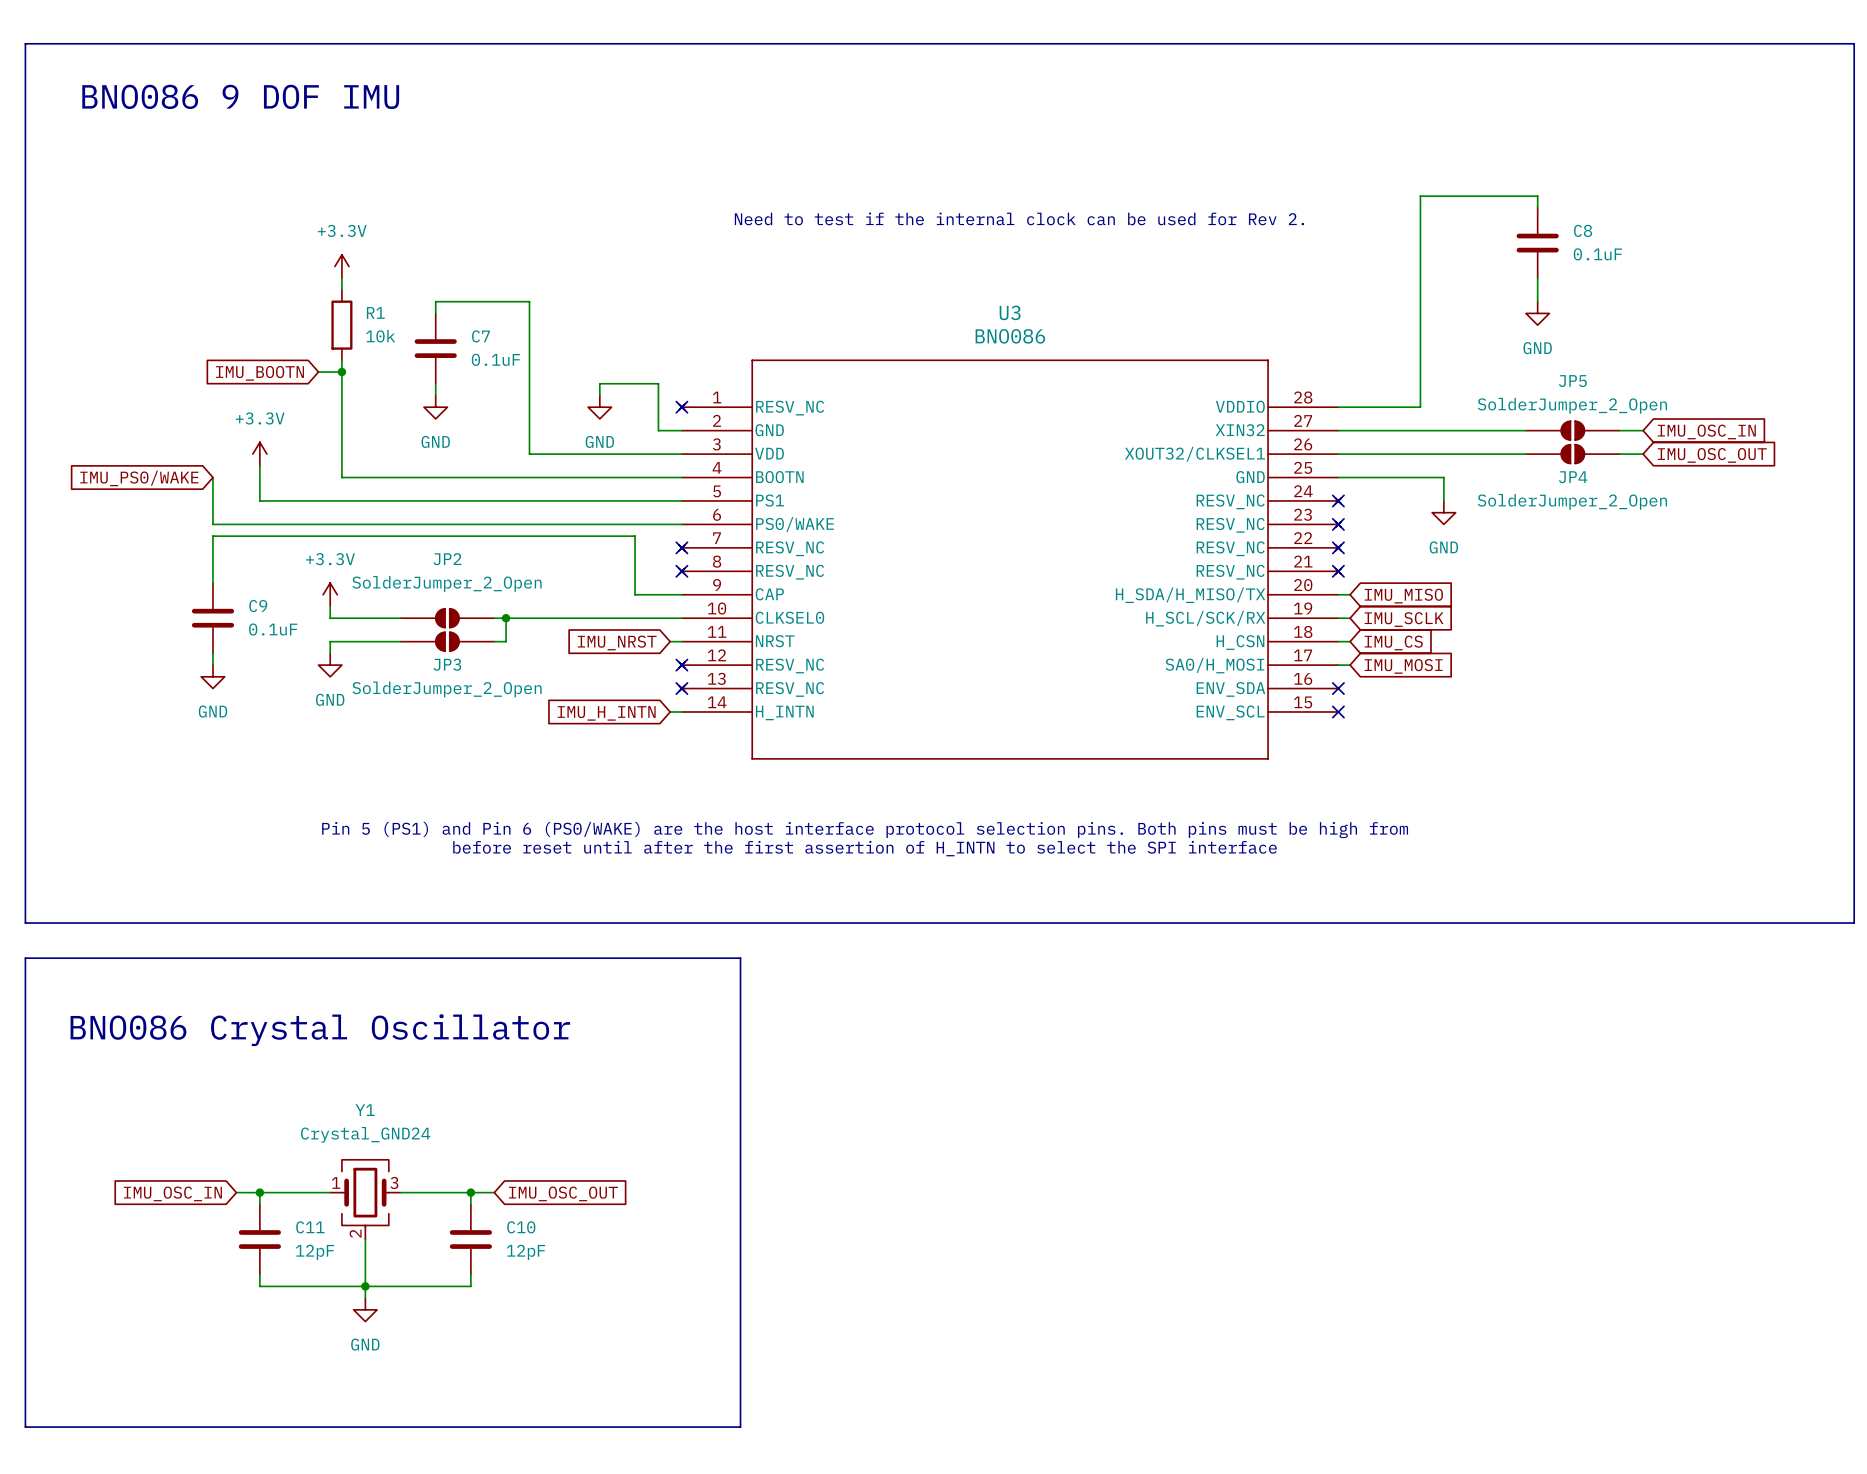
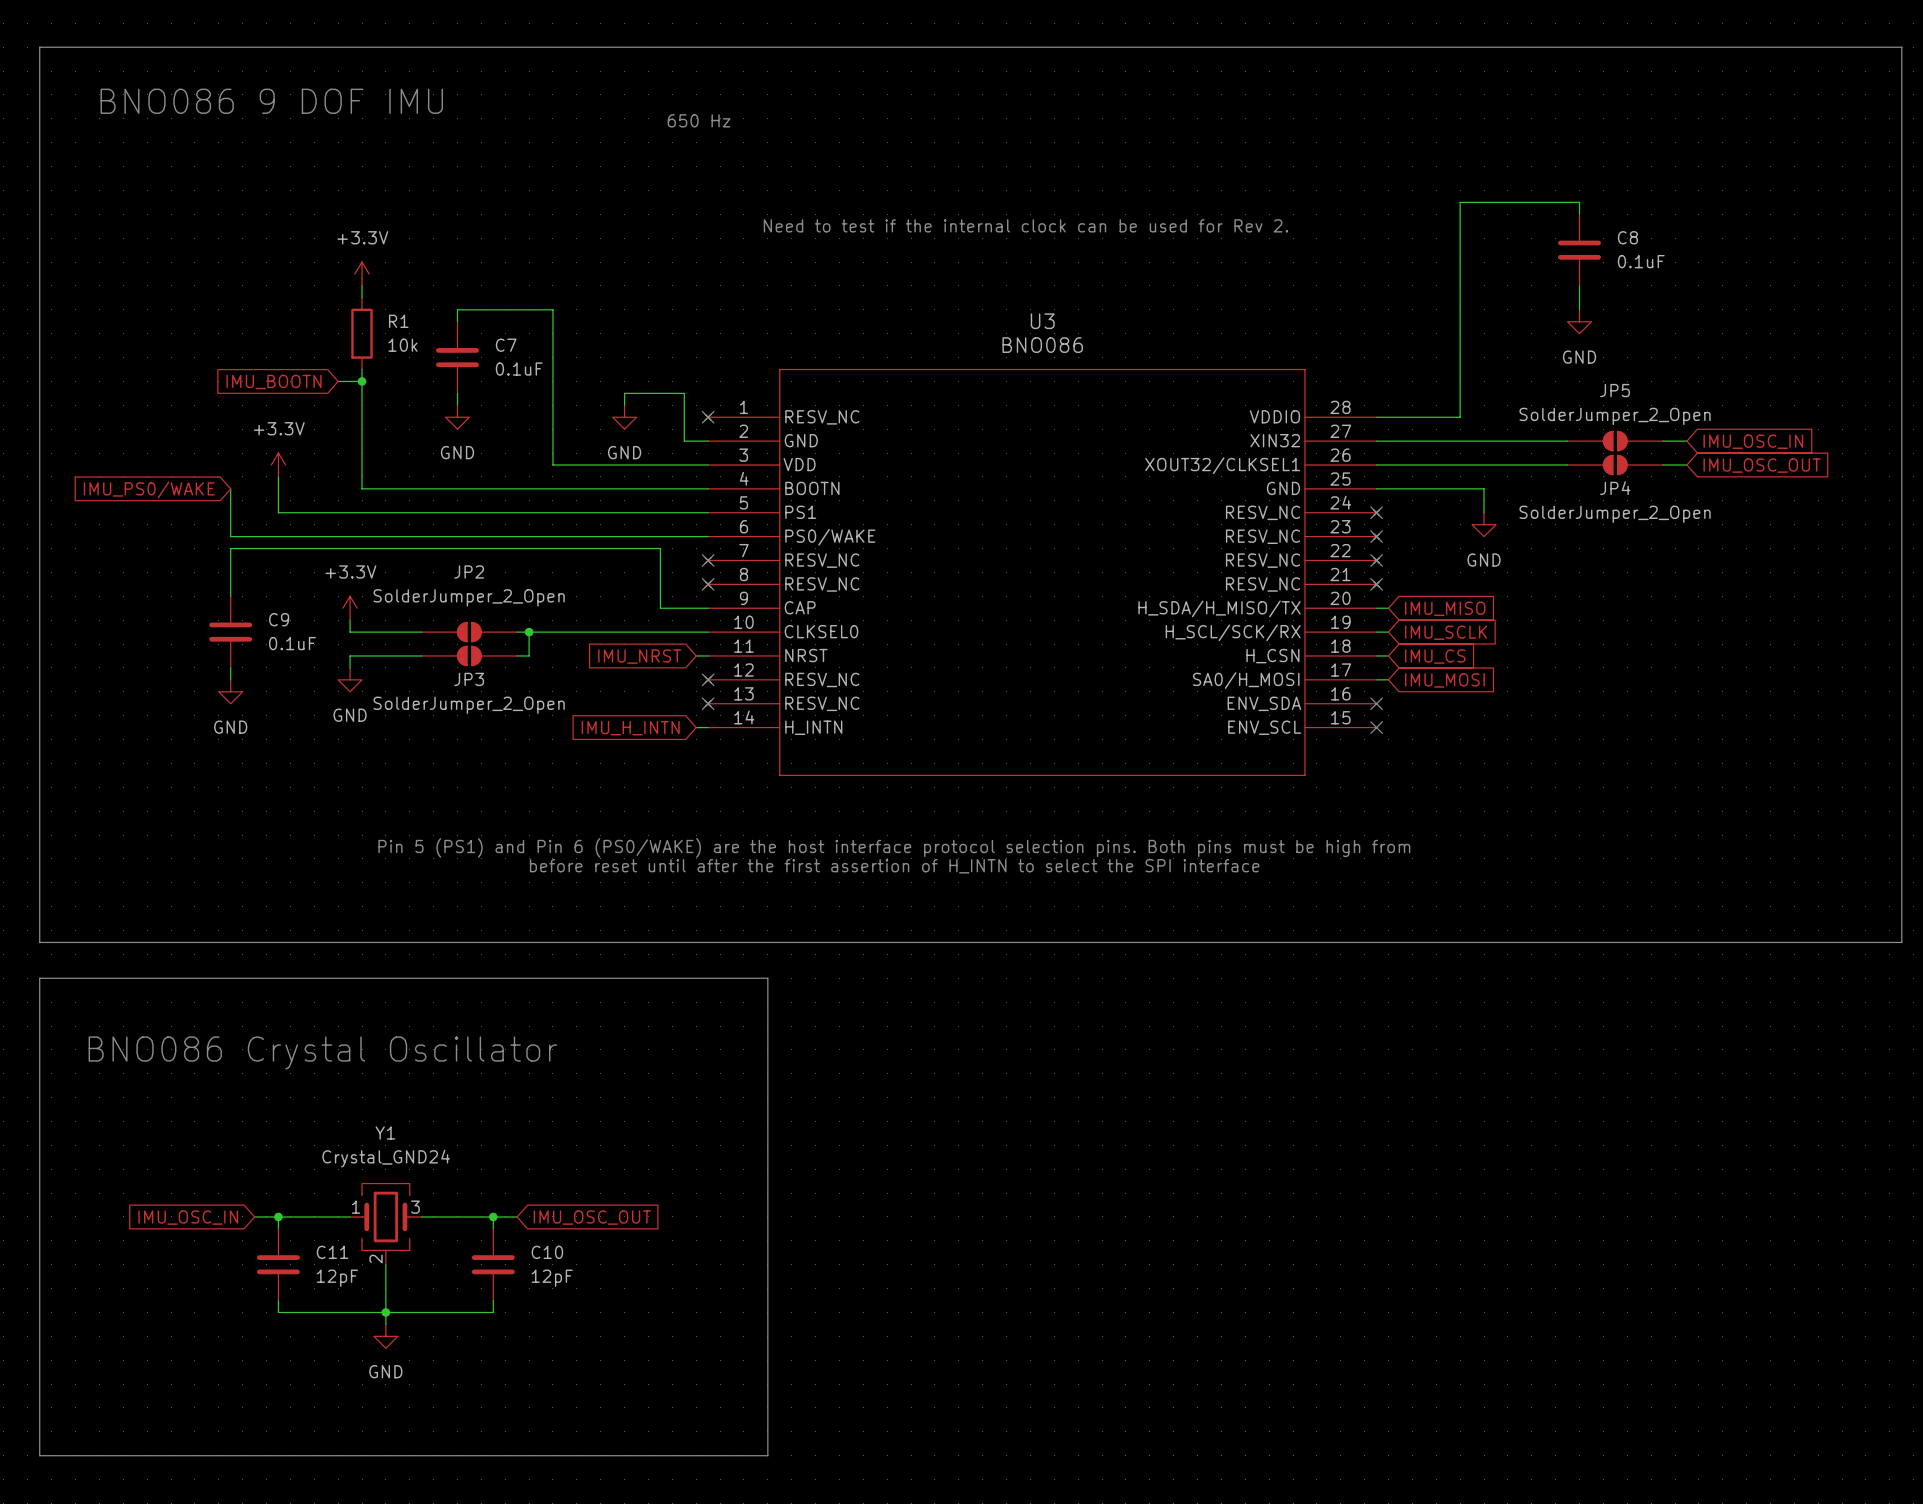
text: none -> 650 Hz (699, 120)

